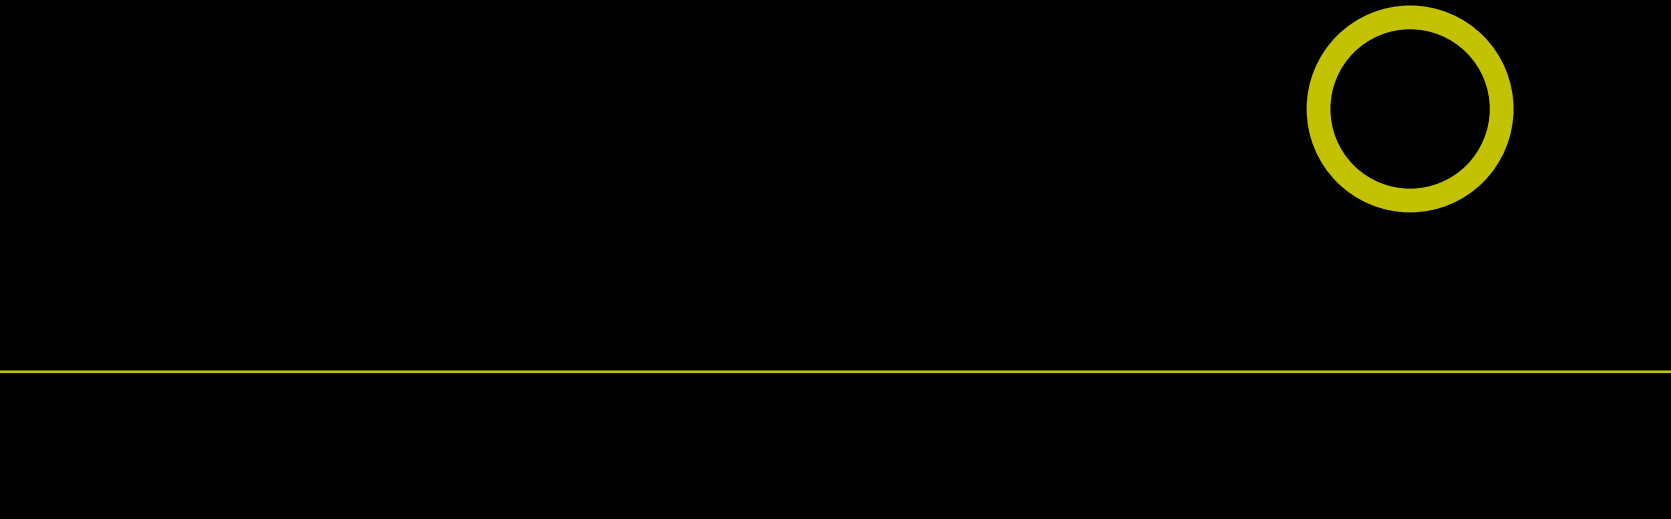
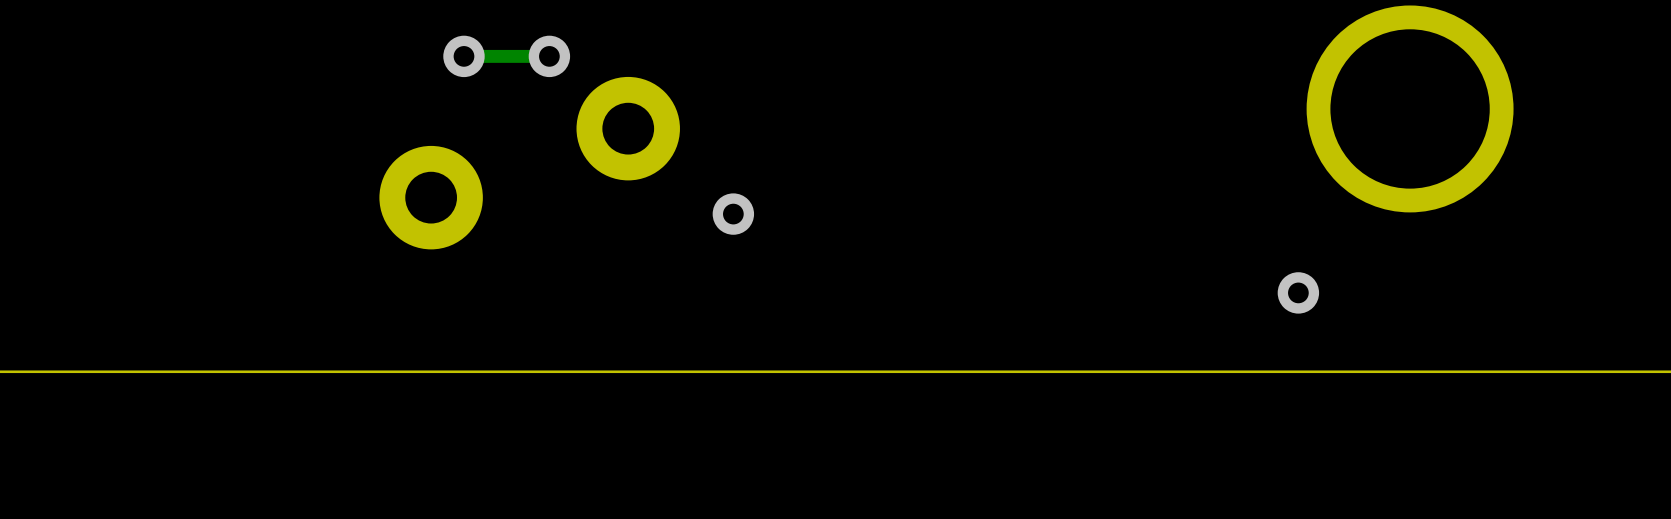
via: none -> (463, 56)
track: none -> (549, 56) (463, 56)
via: none -> (549, 56)
part: none -> (628, 128)
part: none -> (431, 197)
via: none -> (733, 214)
via: none -> (1298, 292)

